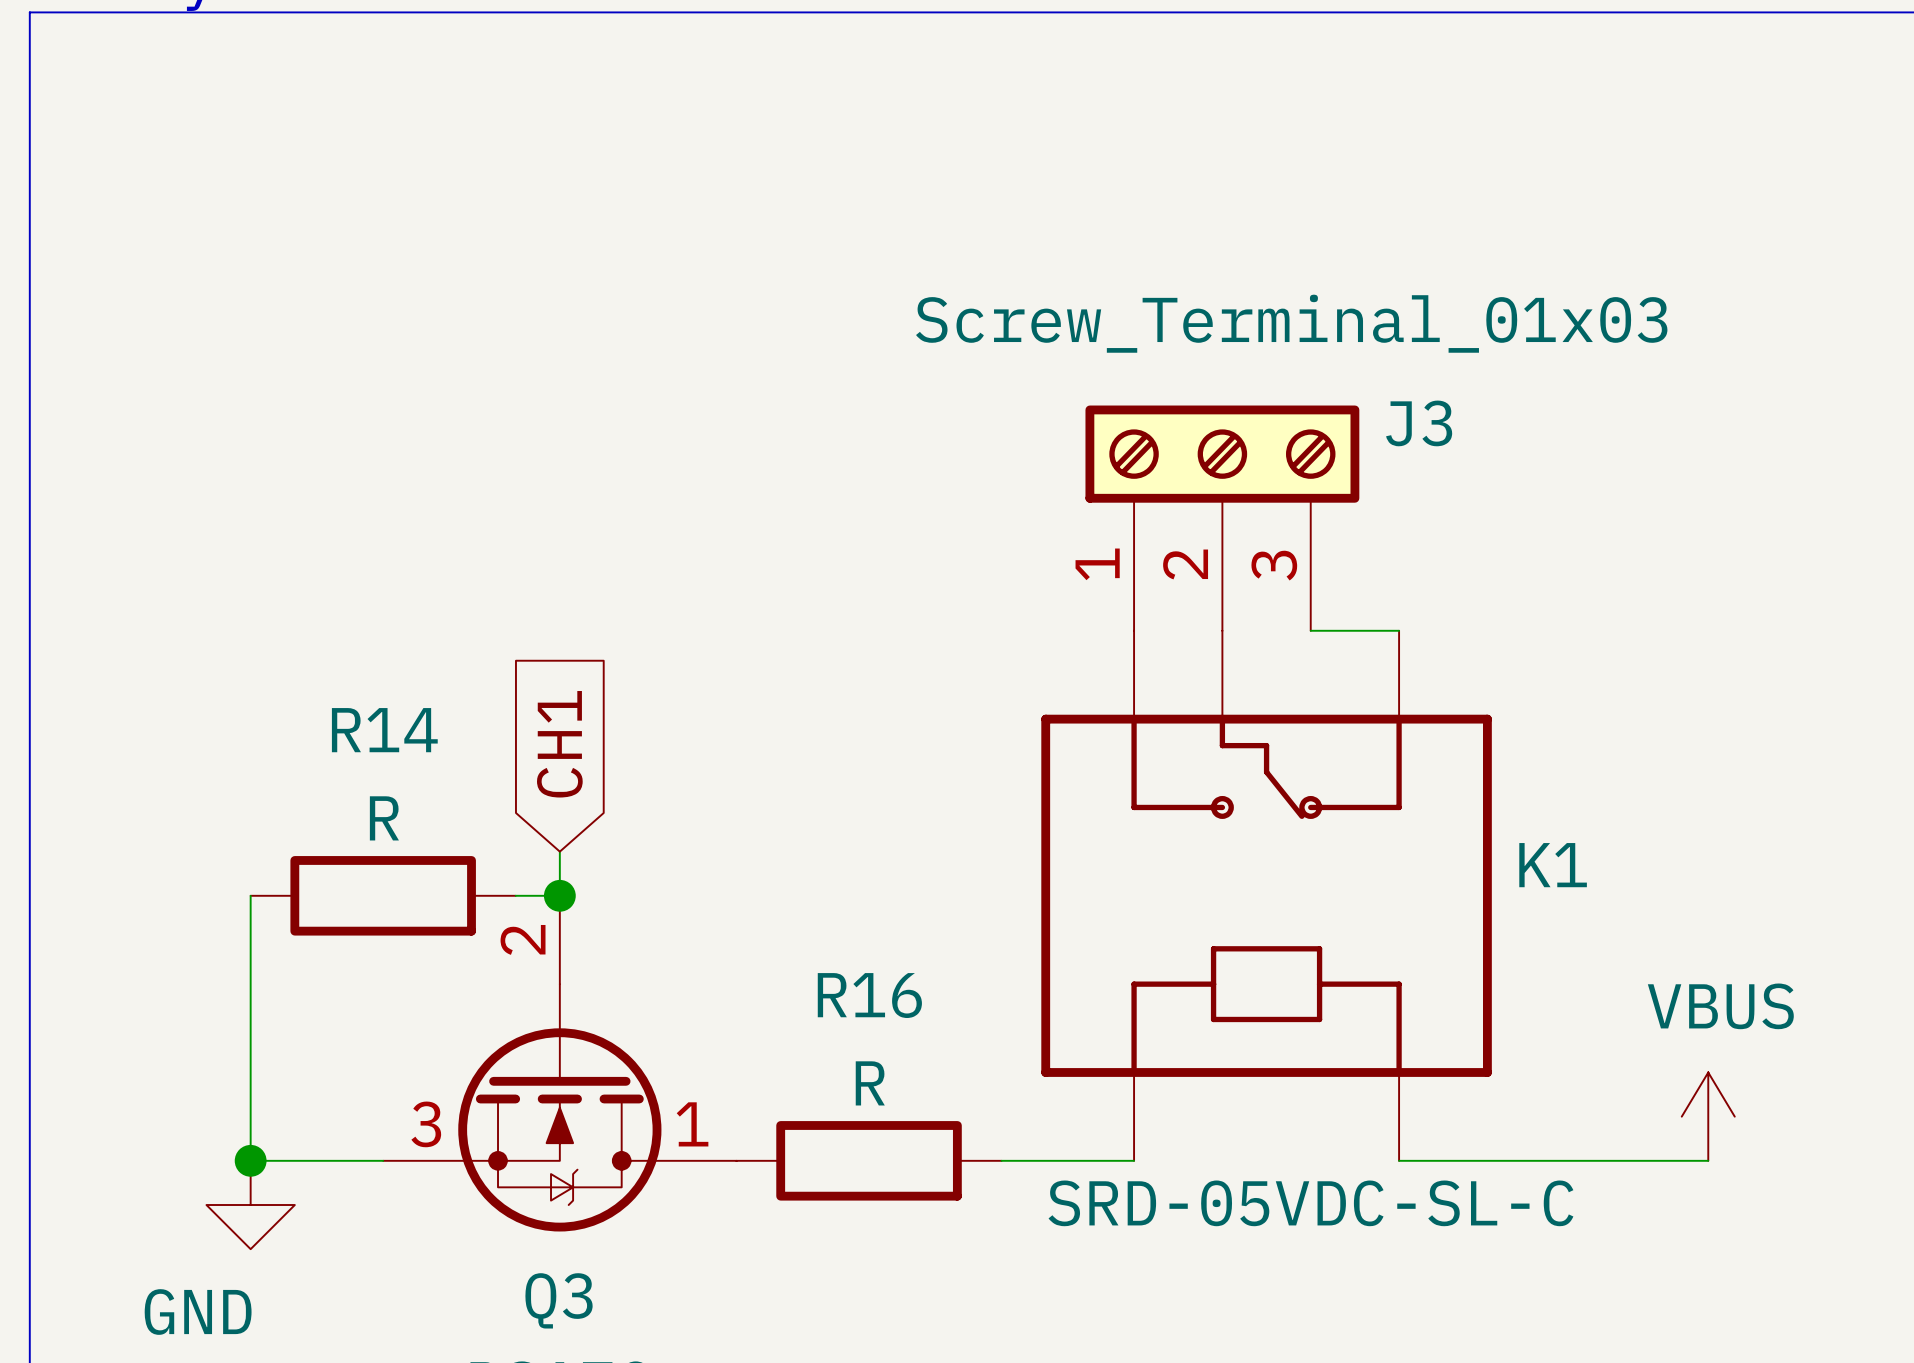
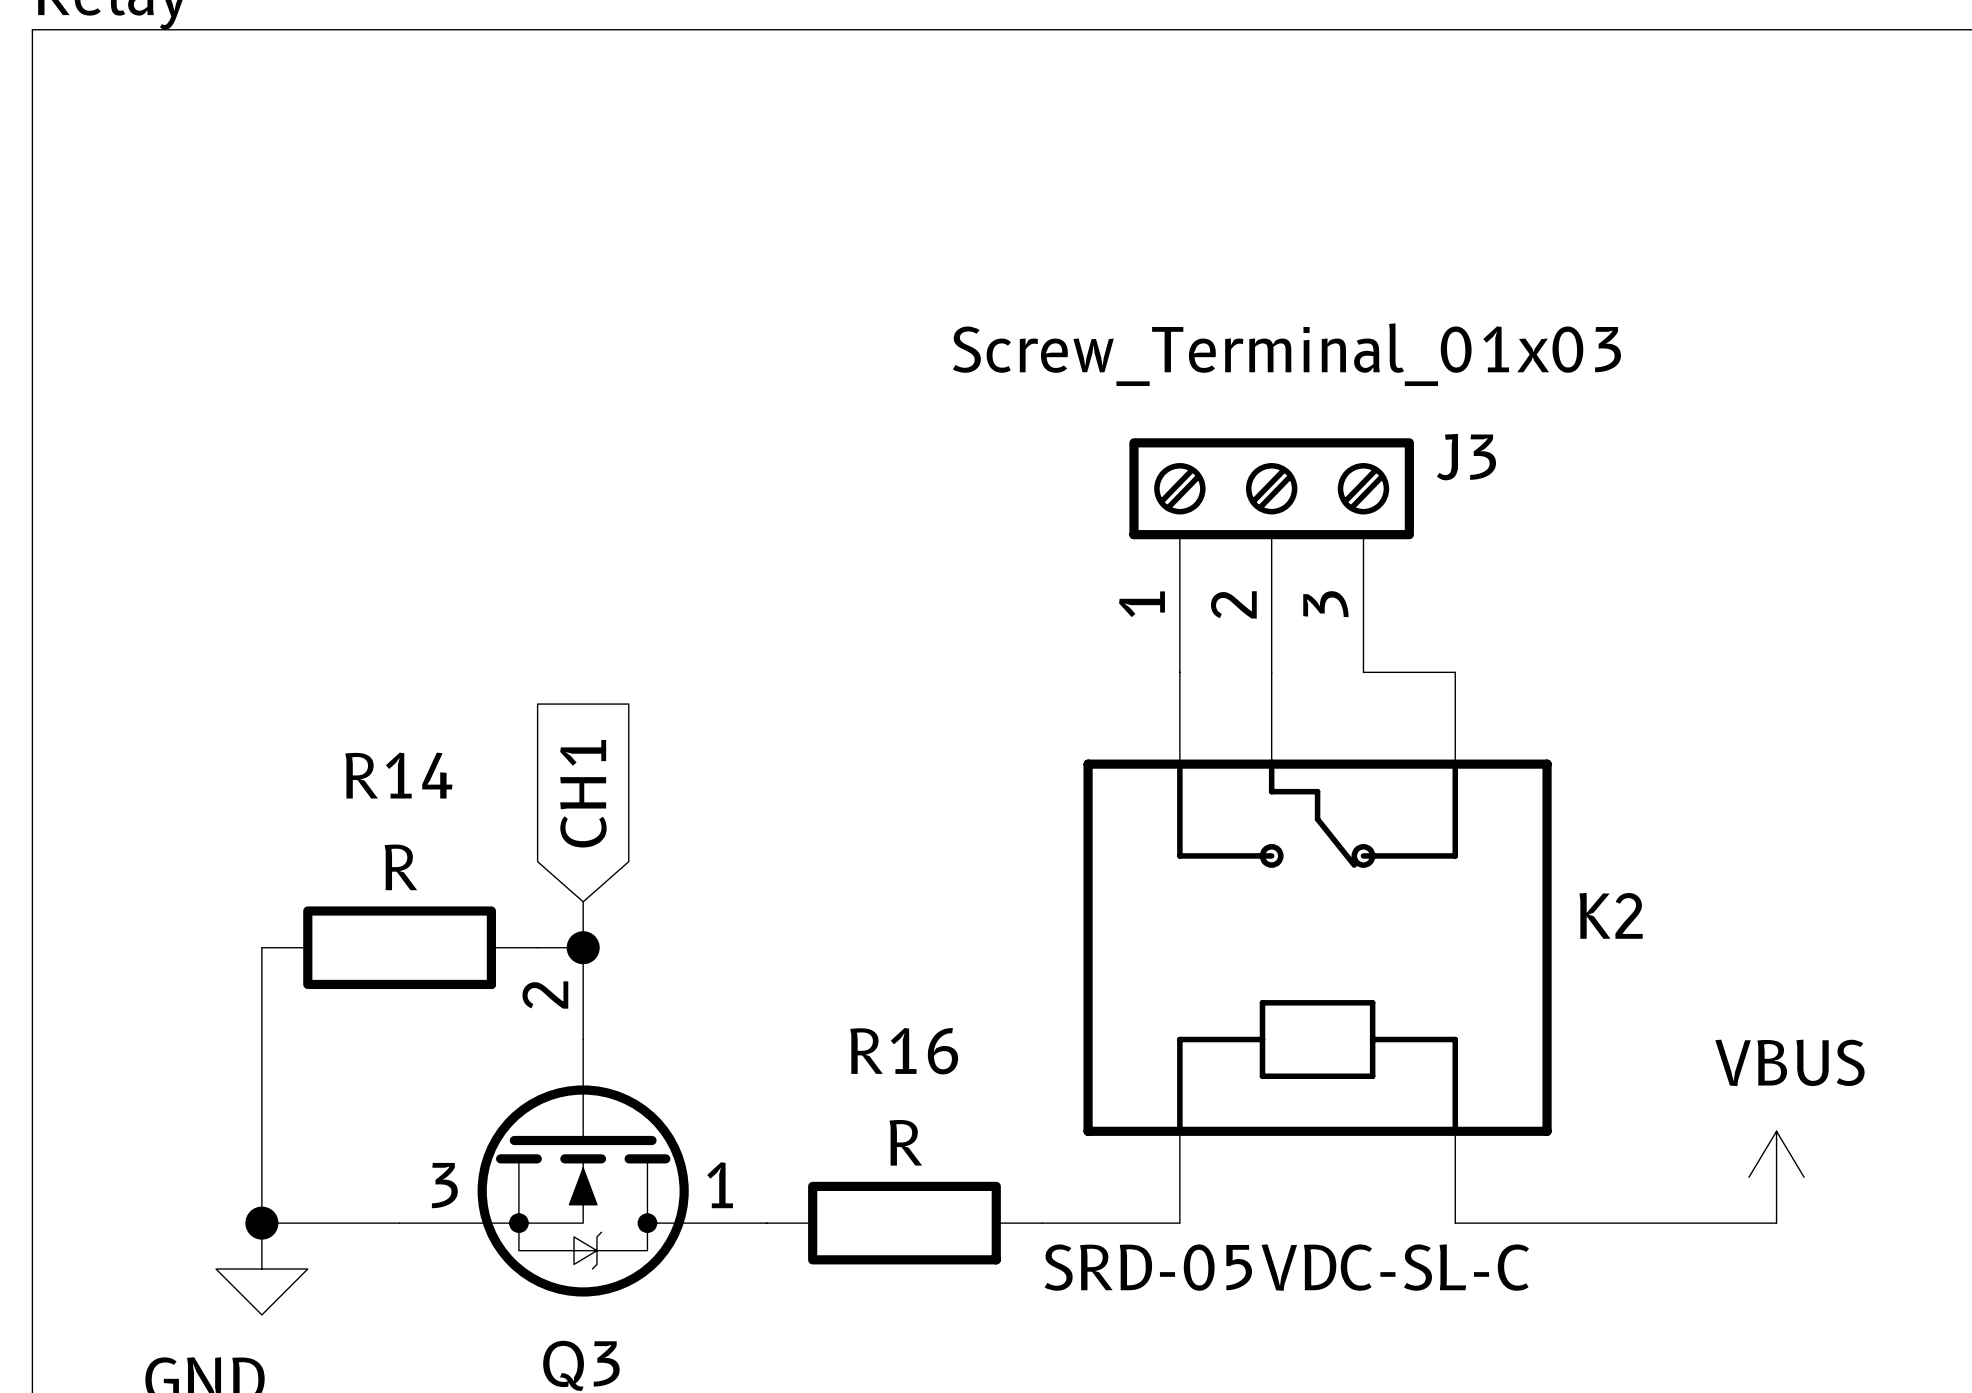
K1 name: K1 (1553, 865) -> K2 (1611, 915)
K1 value position: SRD-05VDC-SL-C (1310, 1203) -> SRD-05VDC-SL-C (1286, 1267)

